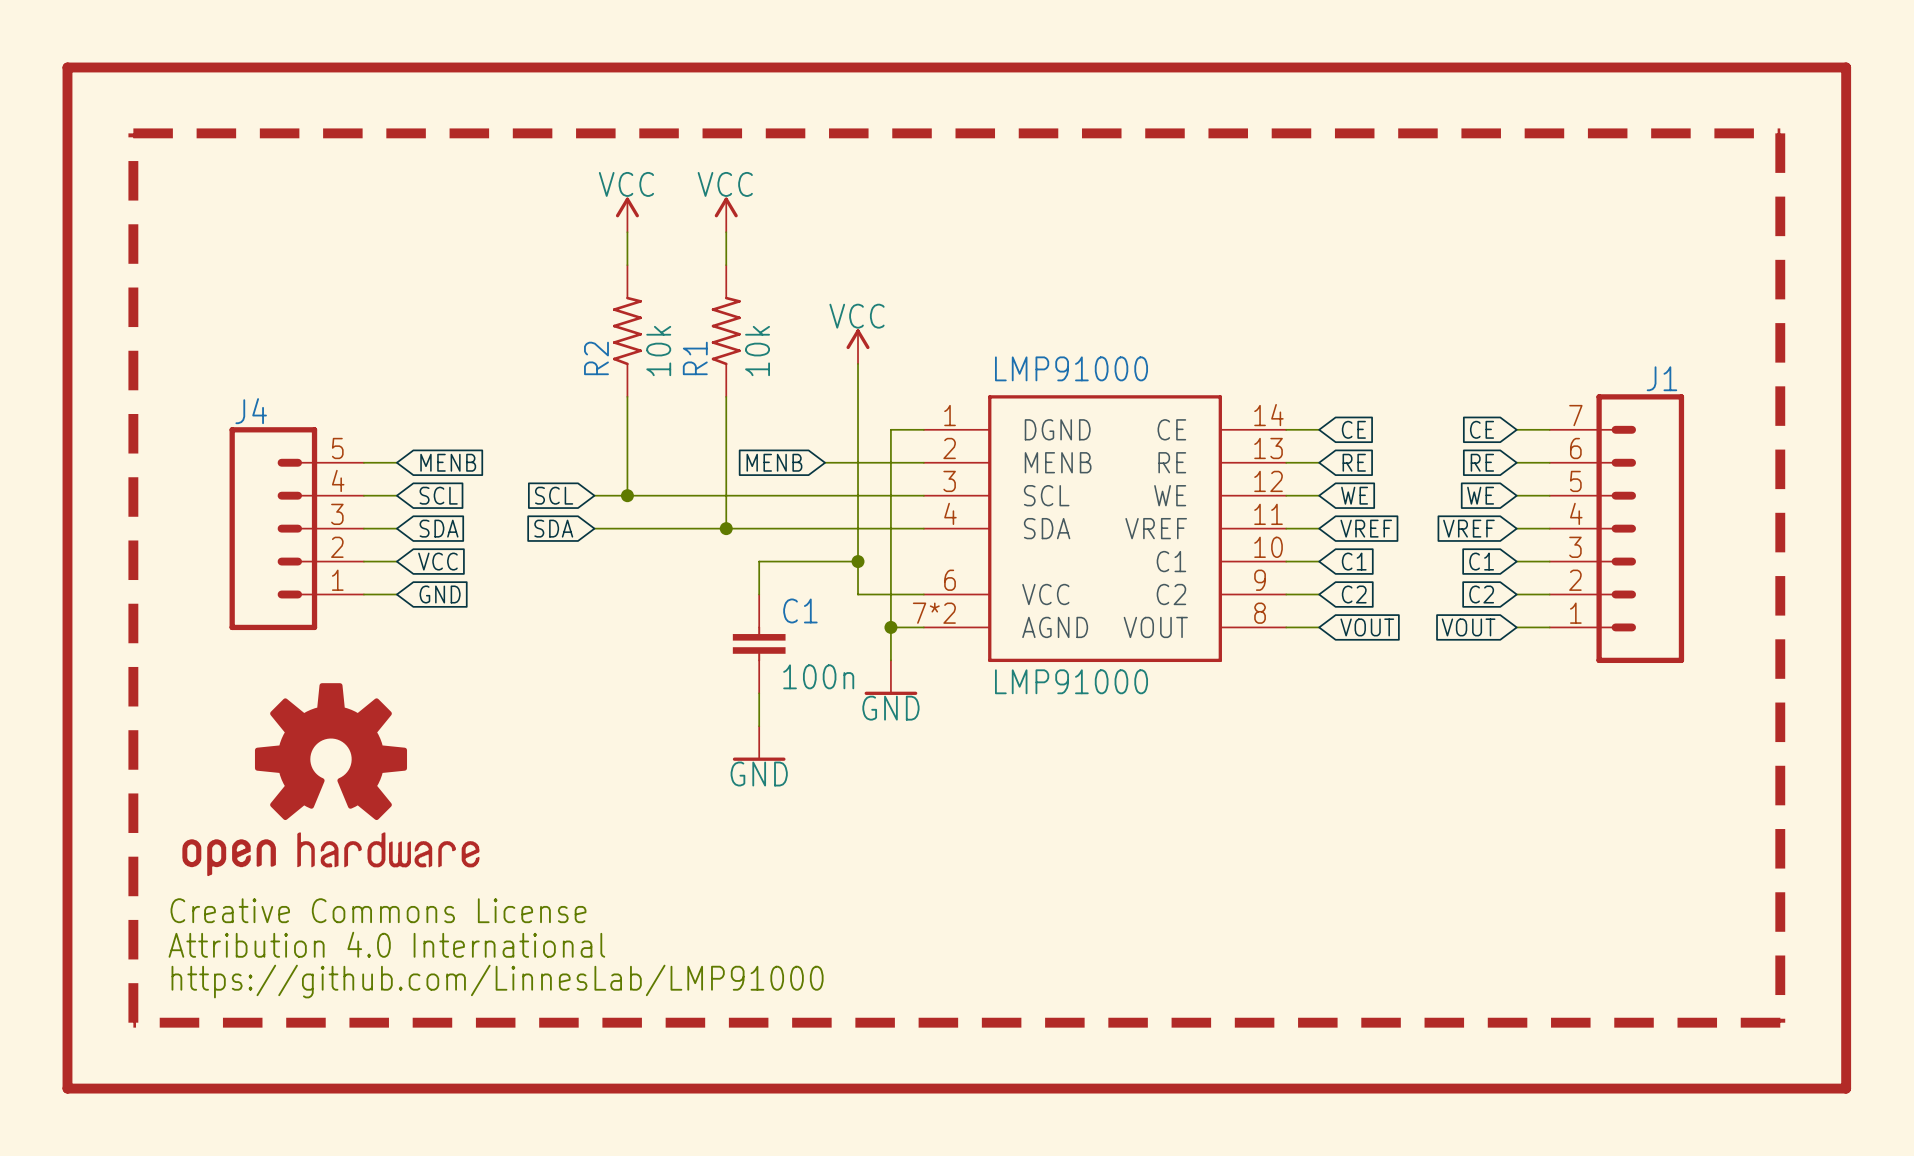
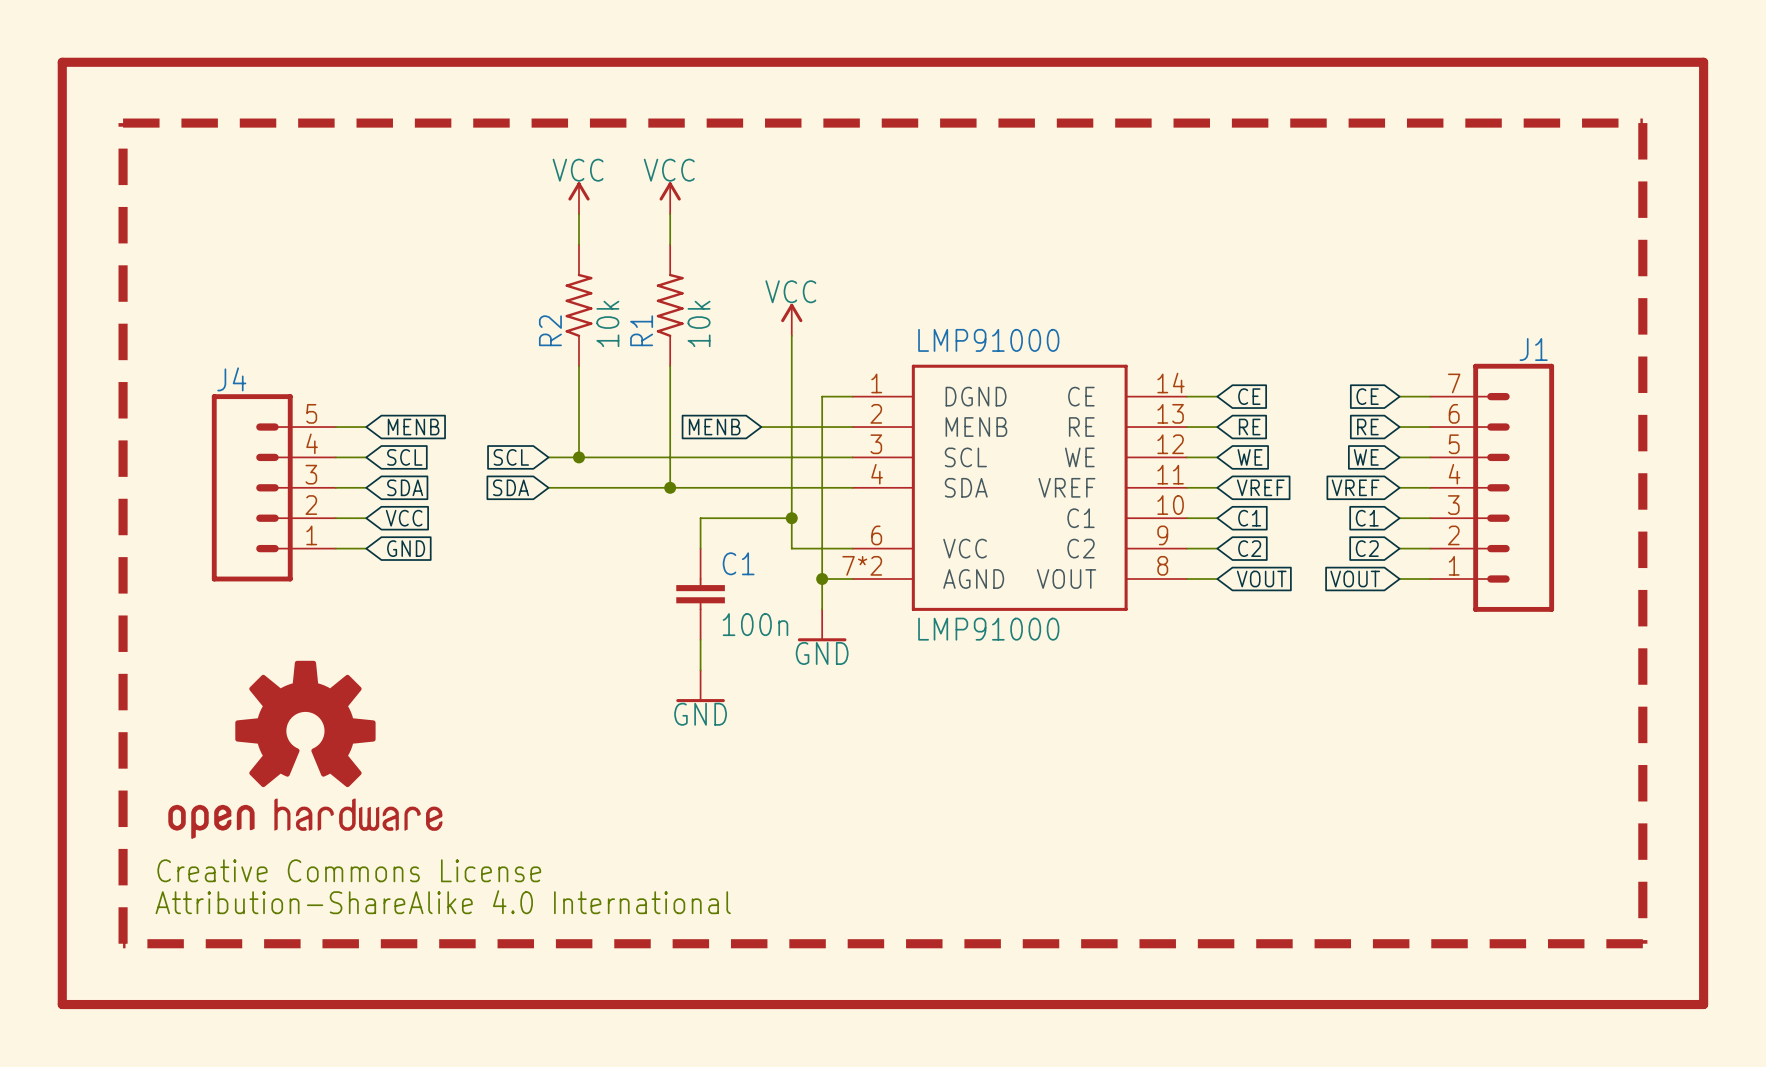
part position: (330, 779) -> (305, 749)
text: Creative Commons License (378, 910) -> none
text: Attribution 4.0 International (386, 944) -> Creative Commons License (349, 870)
text: https://github.com/LinnesLab/LMP91000 (497, 981) -> Attribution-ShareAlike 4.0 International (443, 902)

